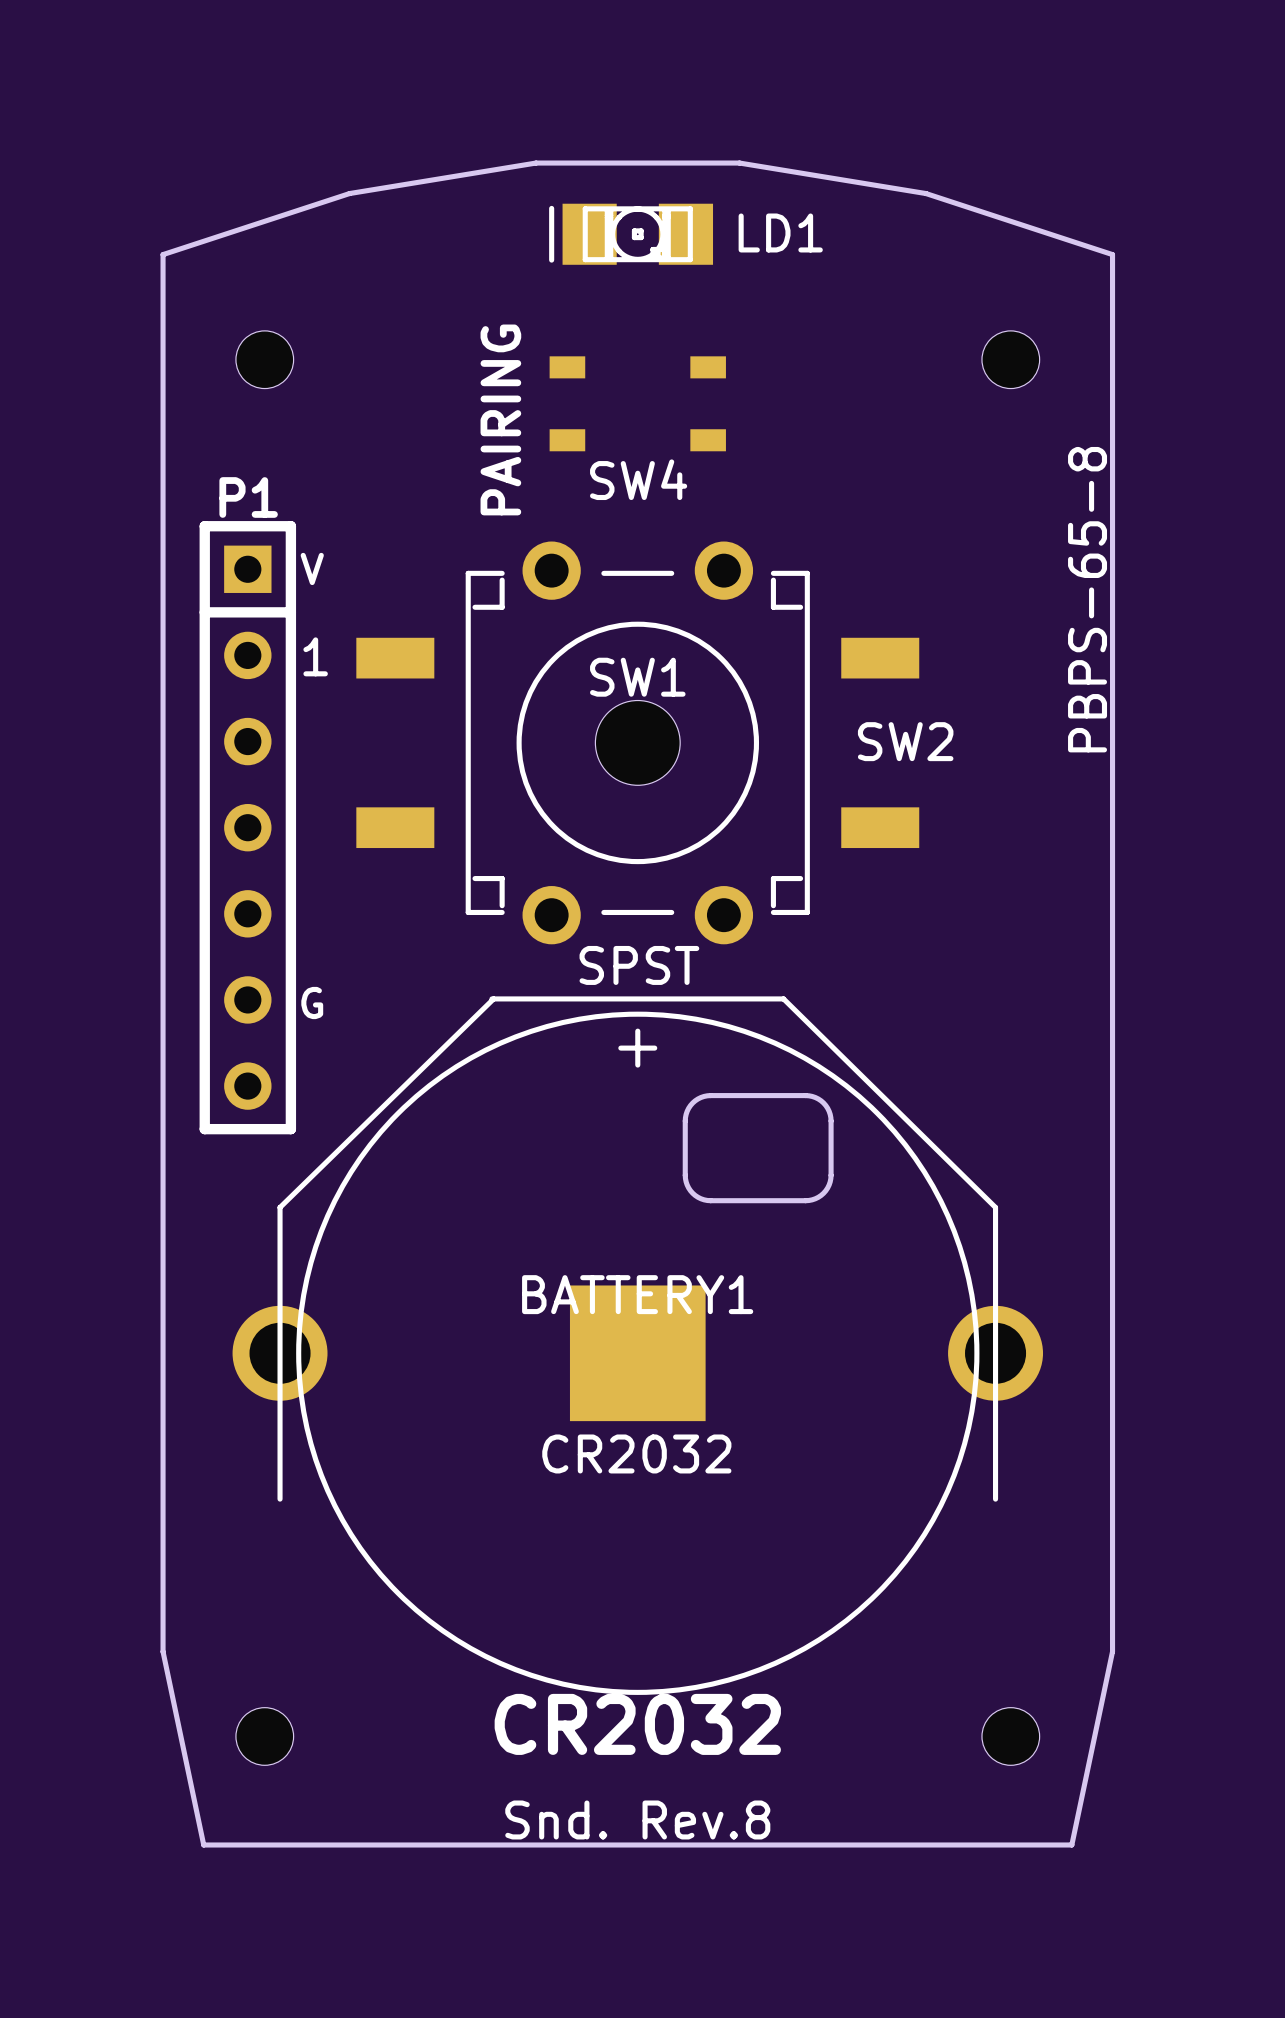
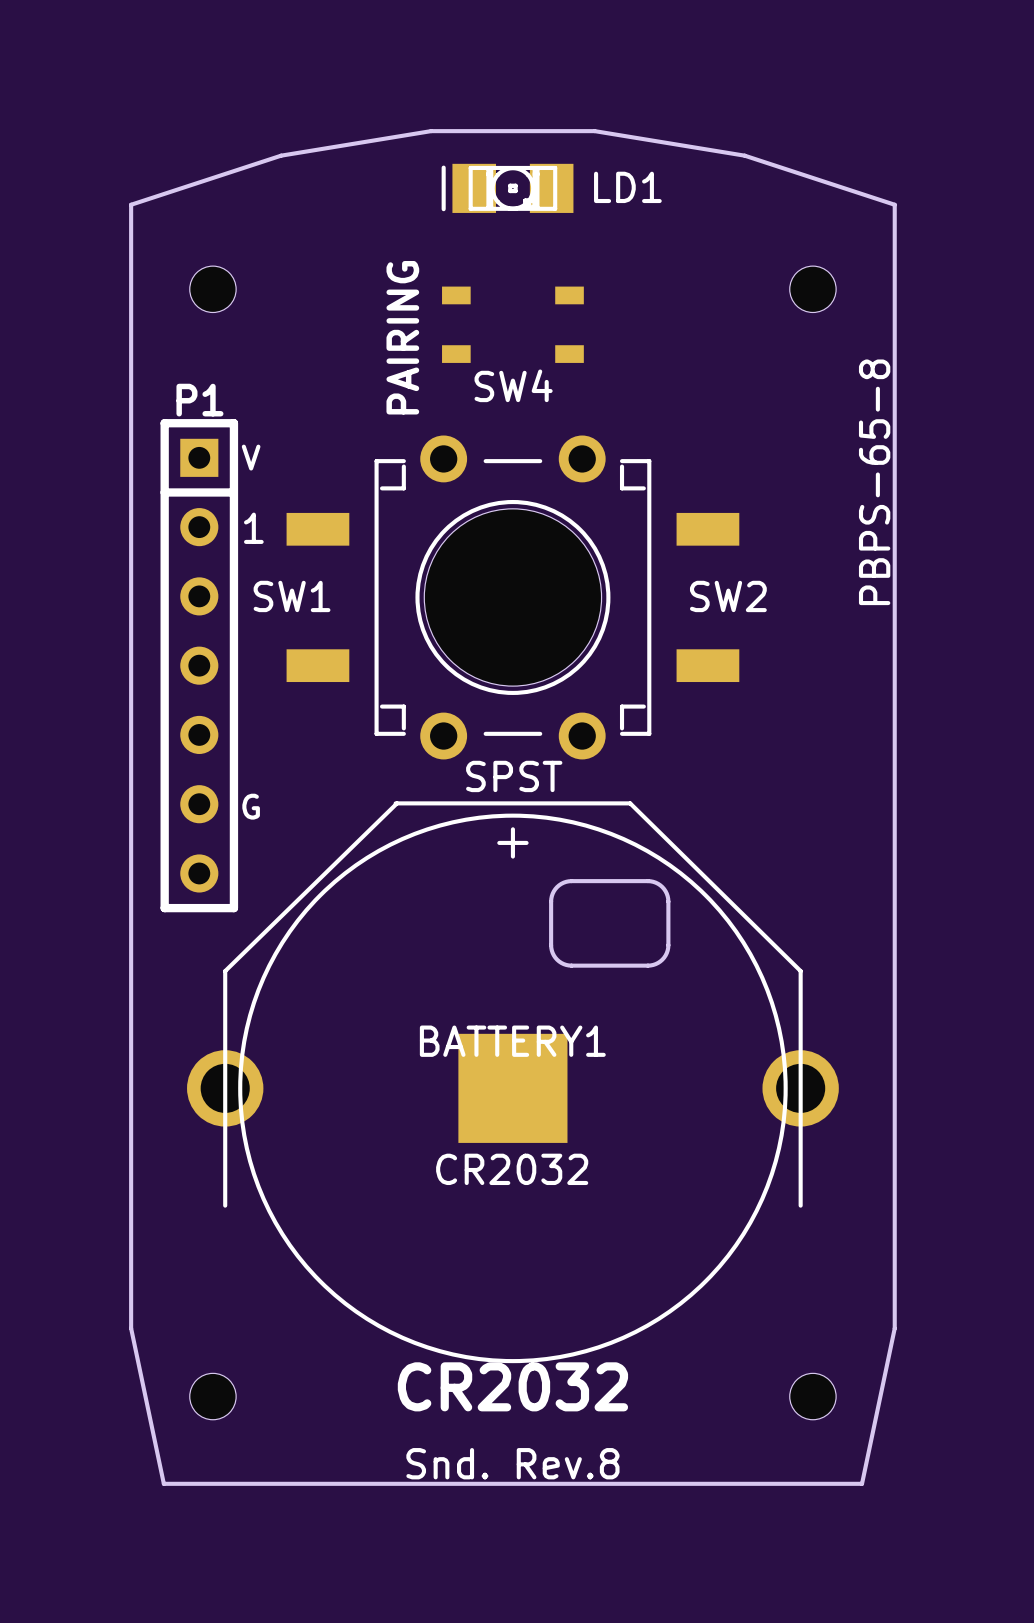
SW1 footprint: [356, 637, 920, 849] -> [286, 508, 740, 687]
SW1 name position: SW1 (637, 677) -> SW1 (292, 596)

